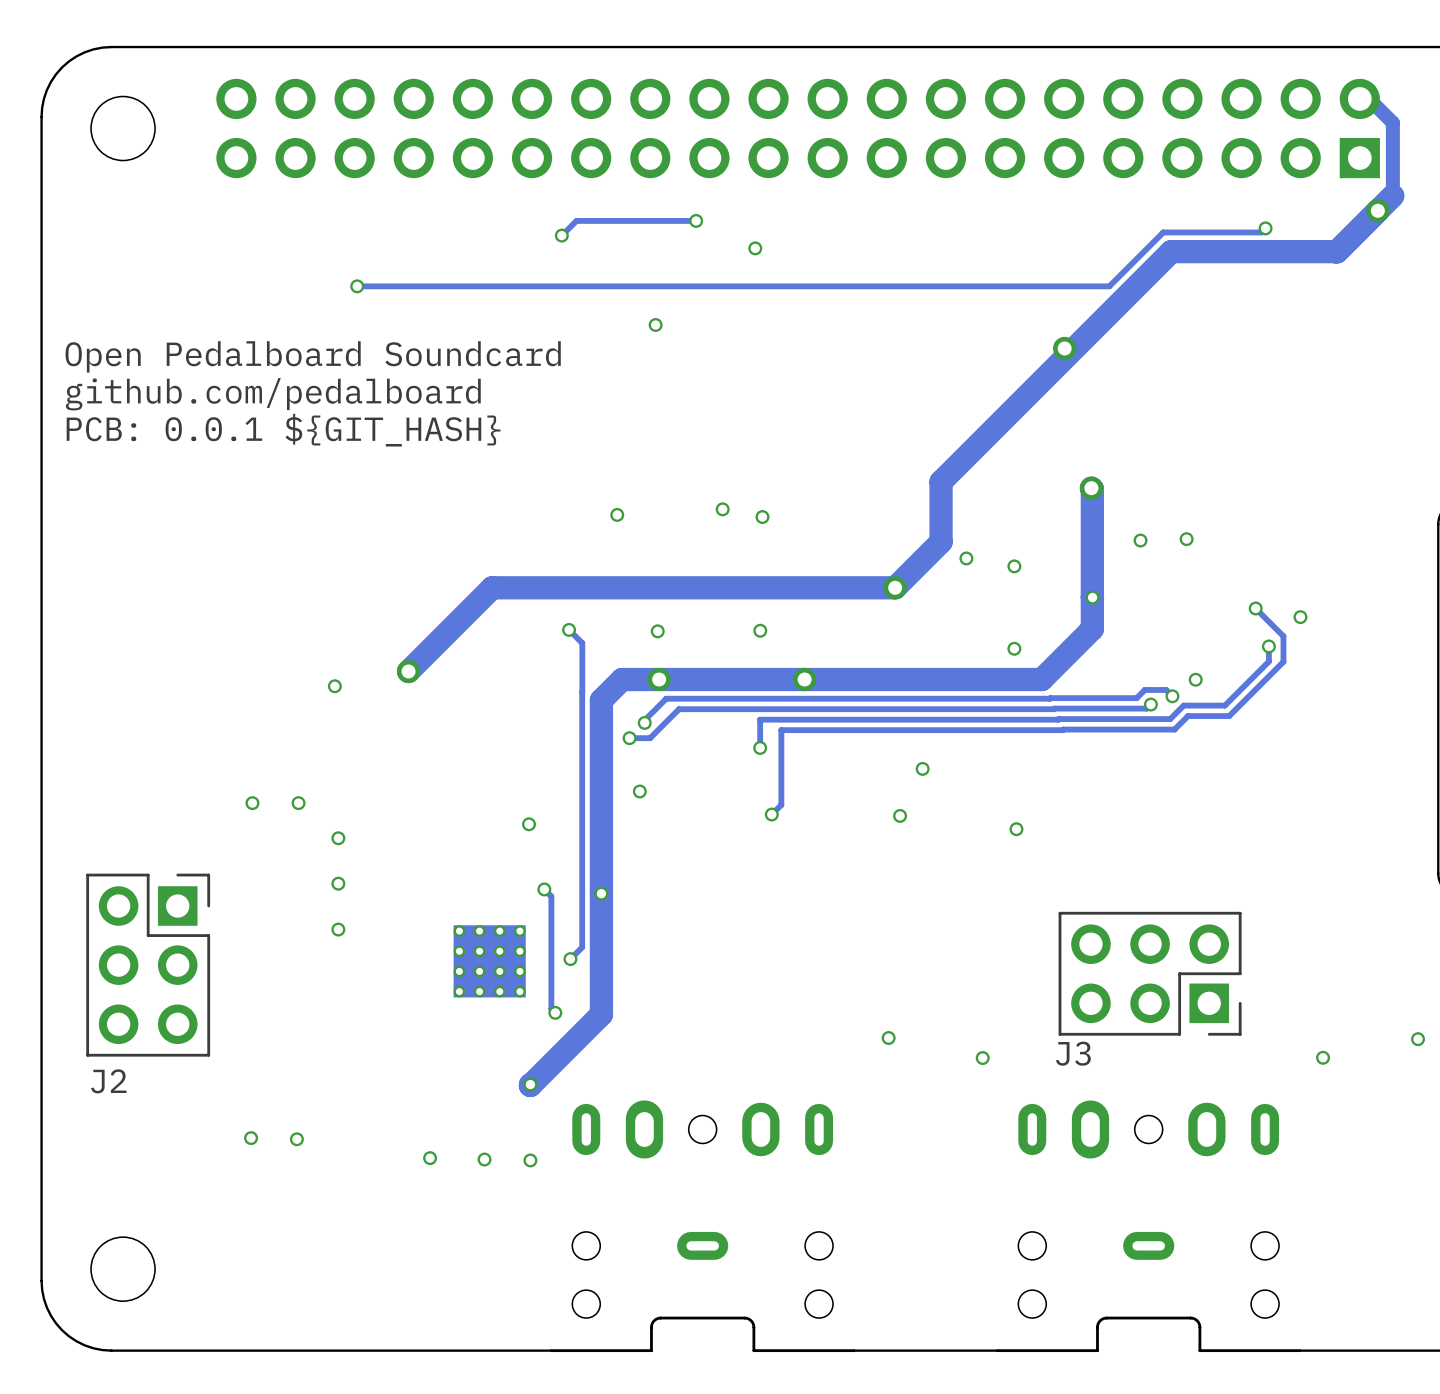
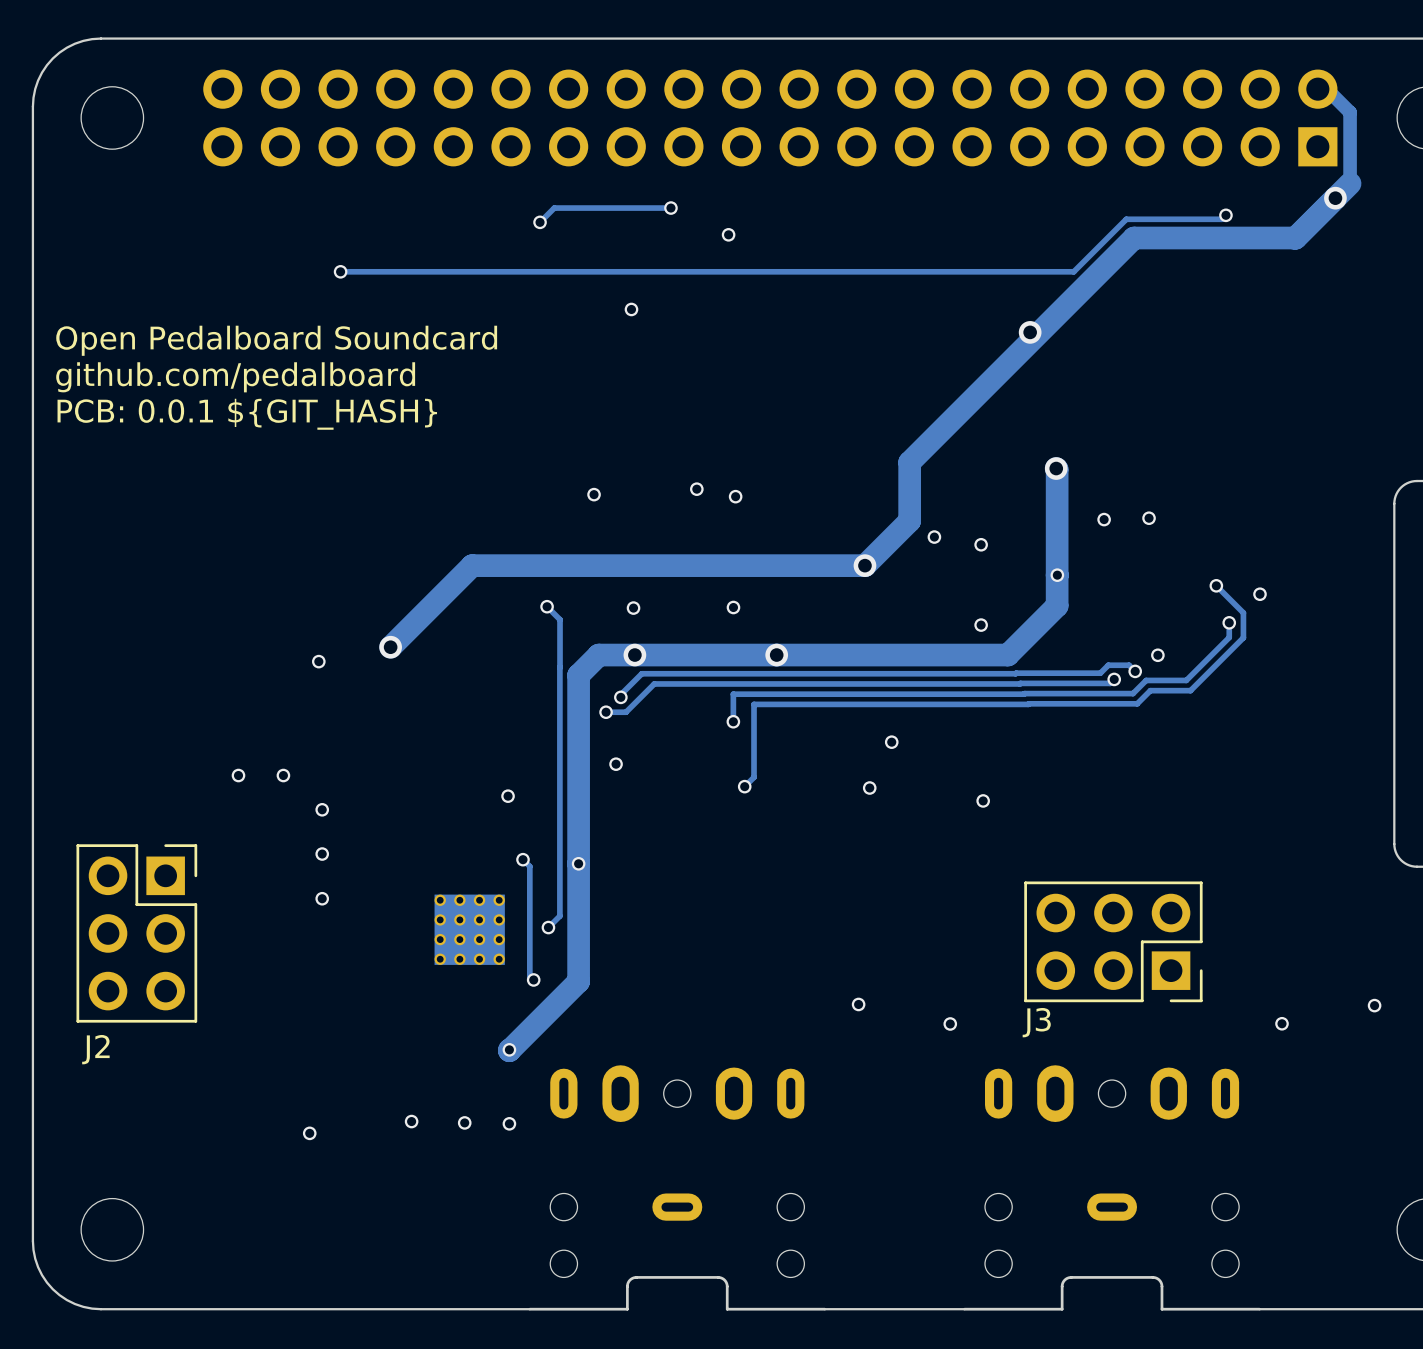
via: (251, 1138) -> none
via: (296, 1139) -> none
via: none -> (309, 1133)

